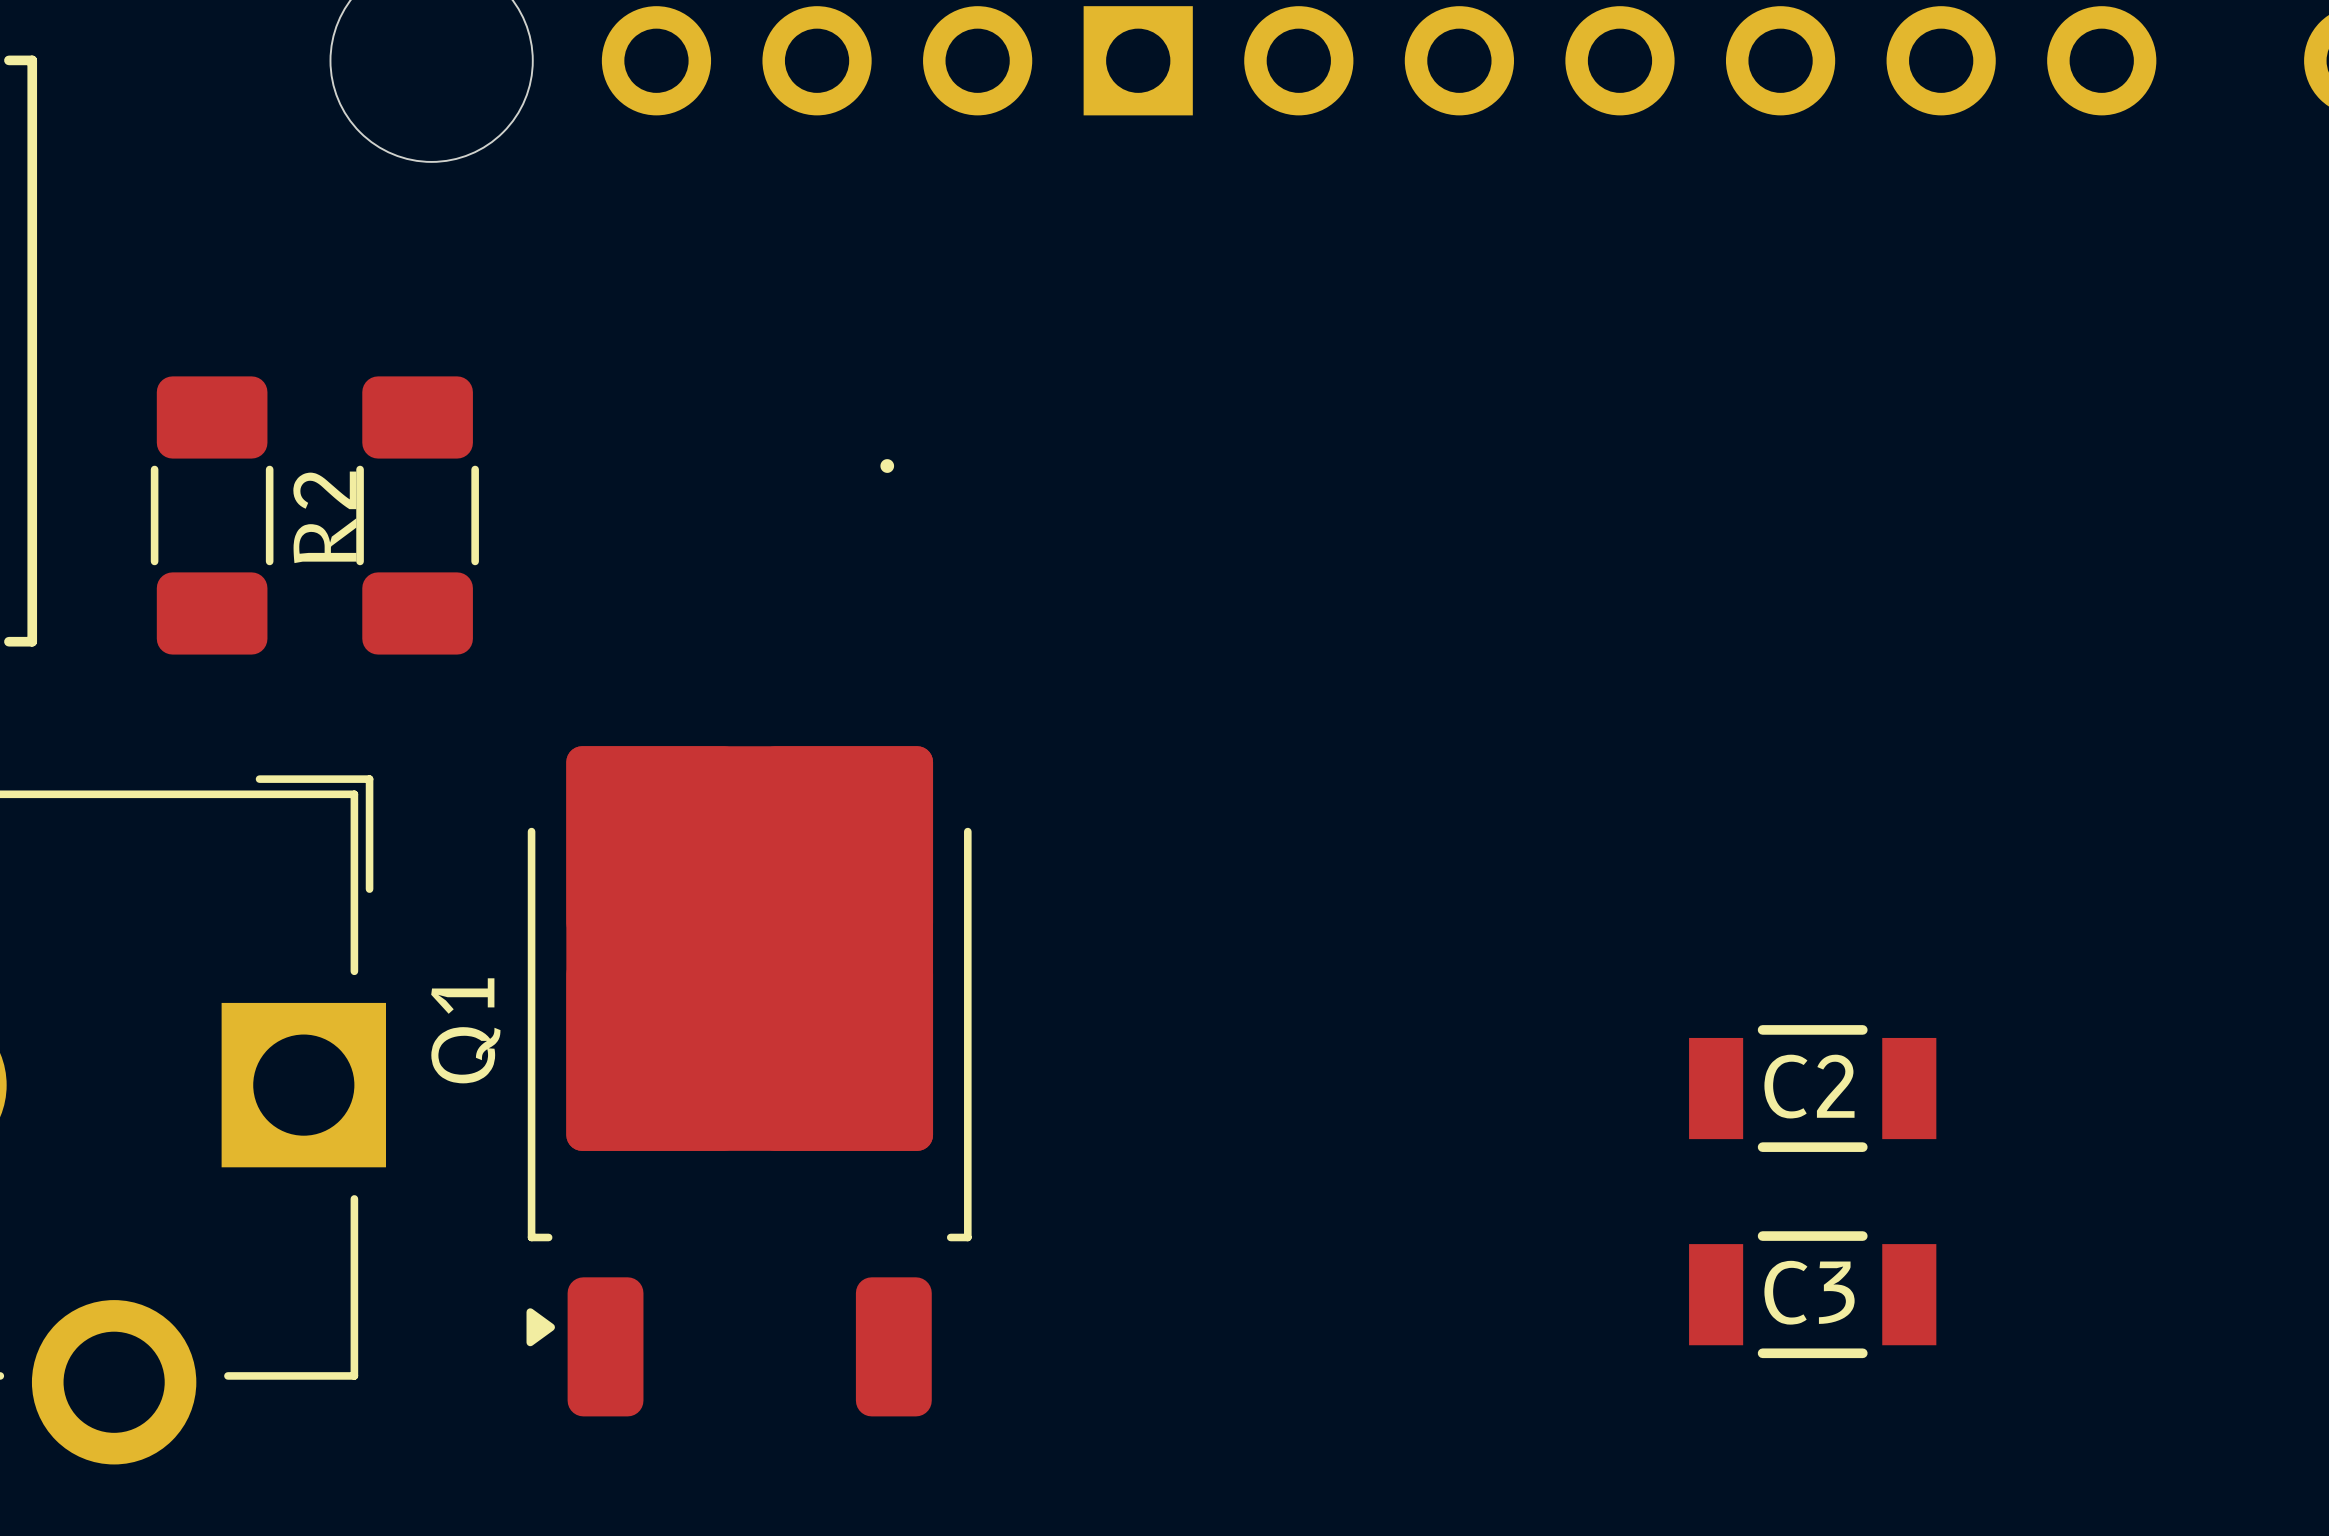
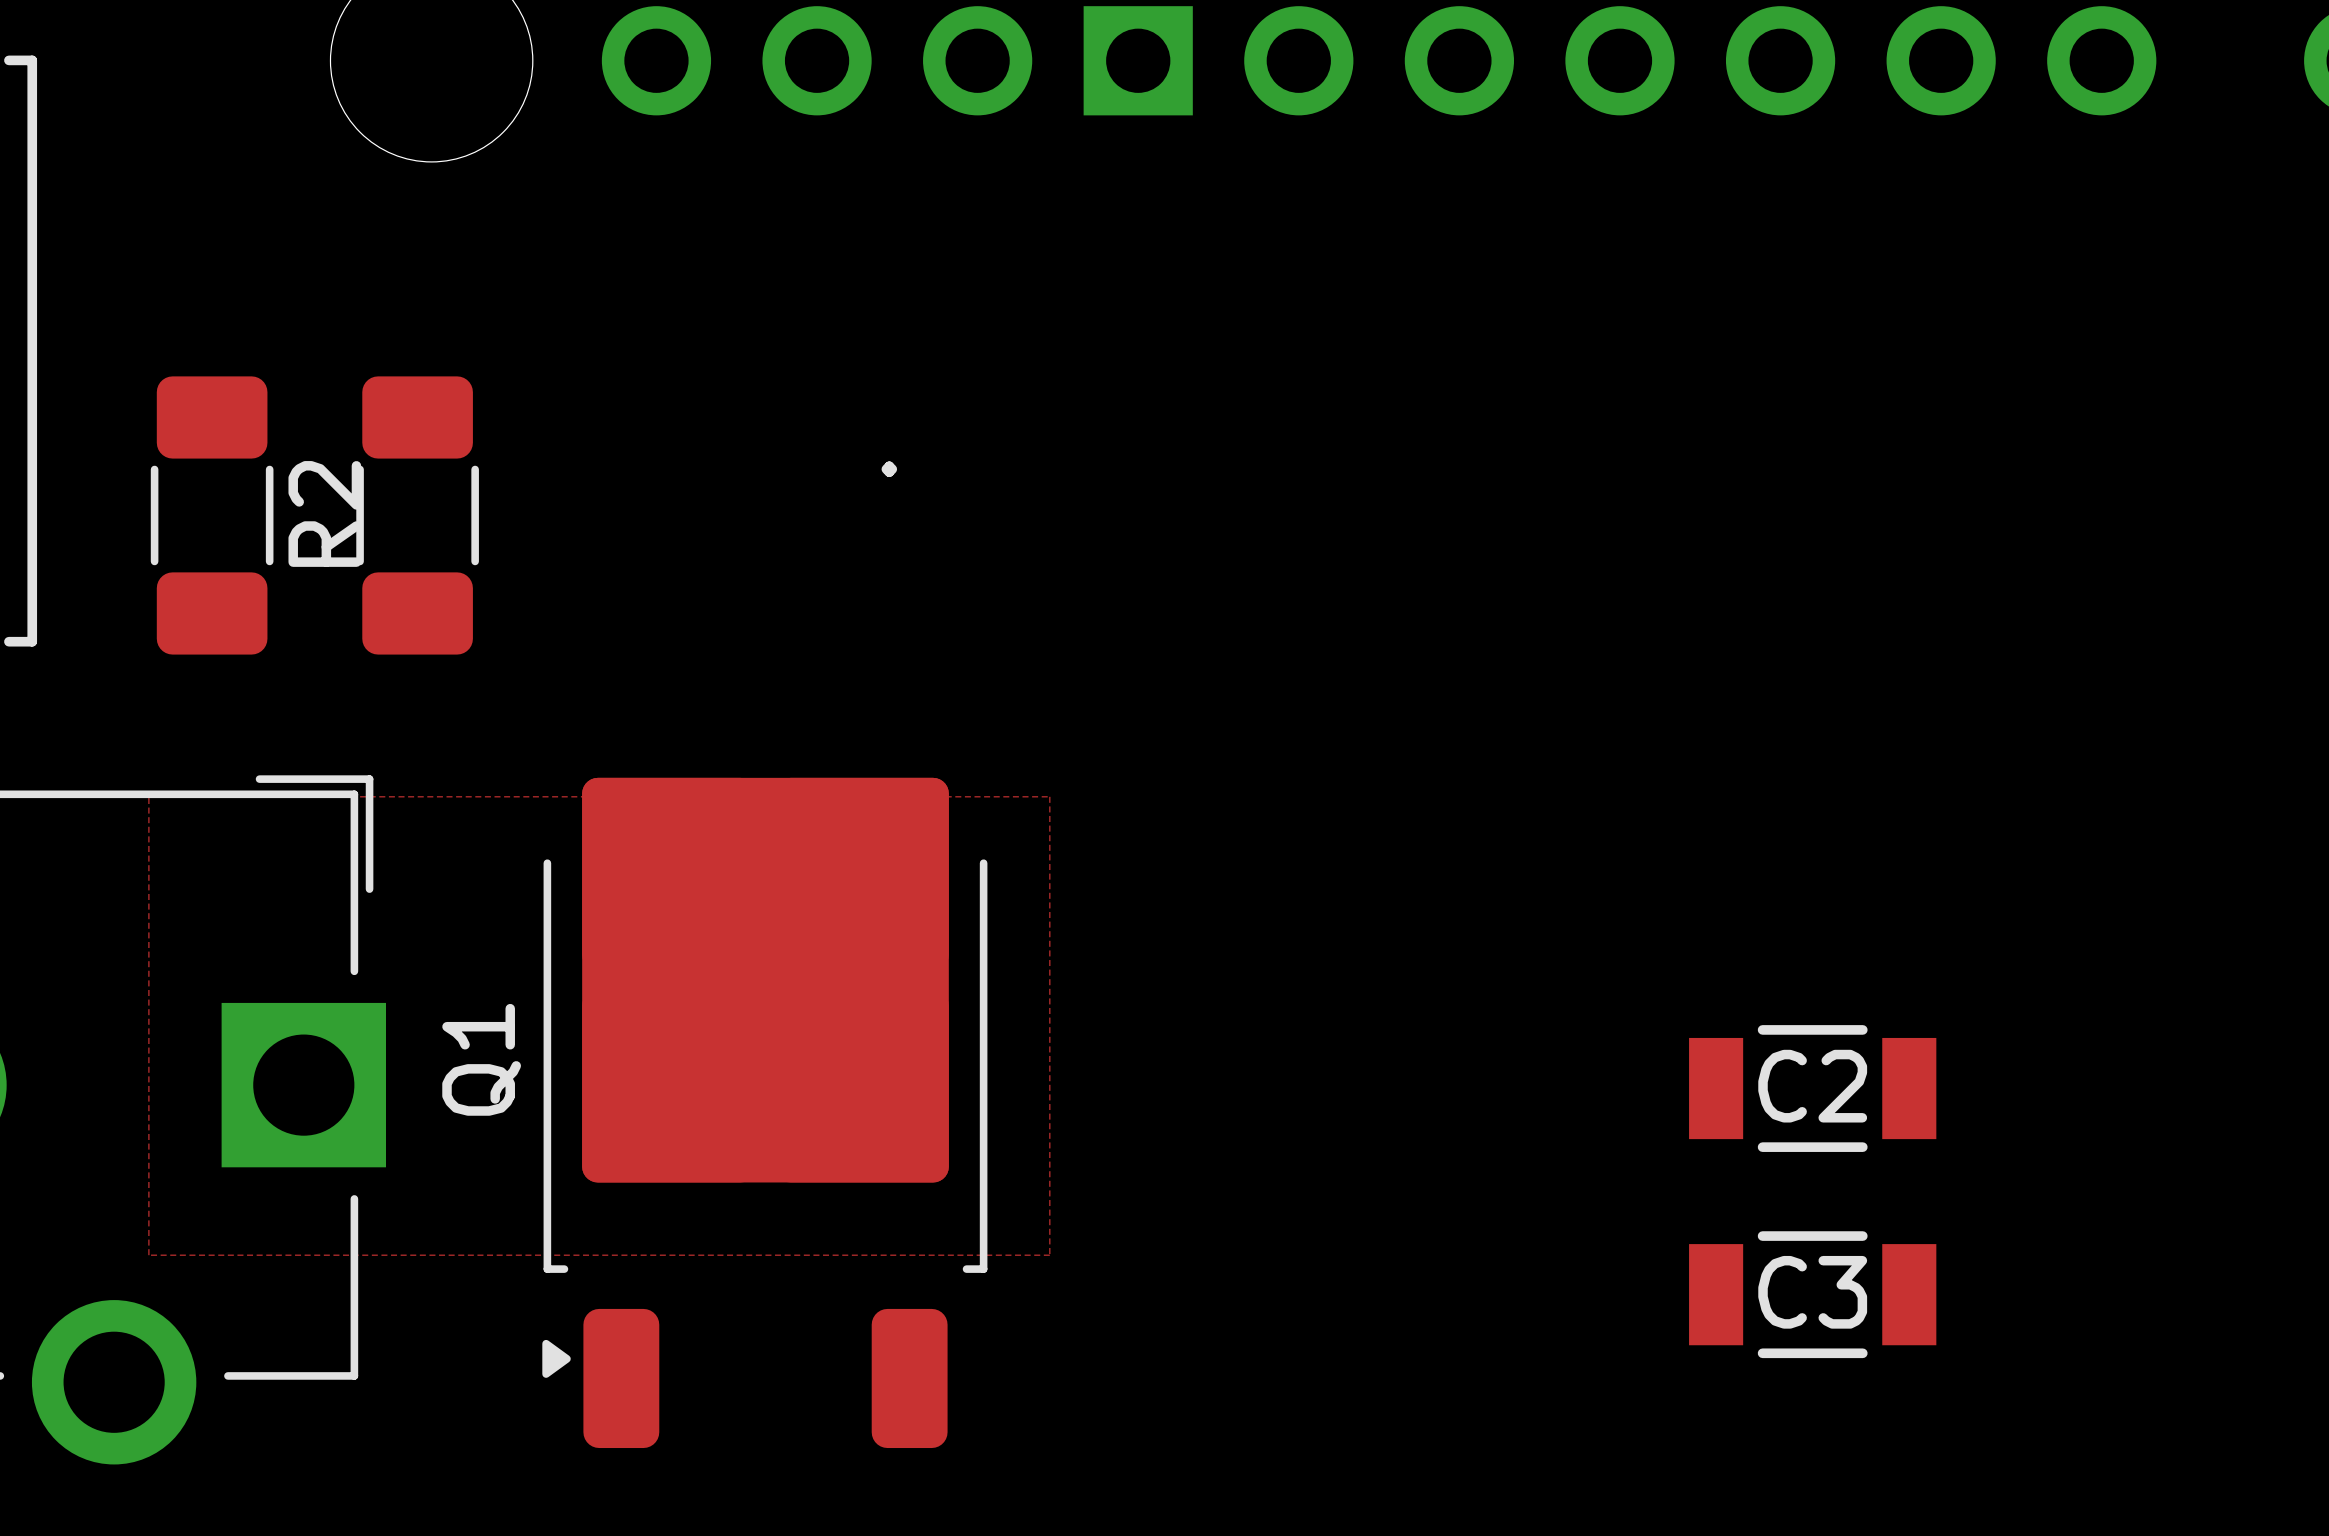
top zone outline: none -> (148, 796) (1049, 796) (1049, 1255) (148, 1255) (148, 796)
Q1 position: (749, 1081) -> (764, 1112)

